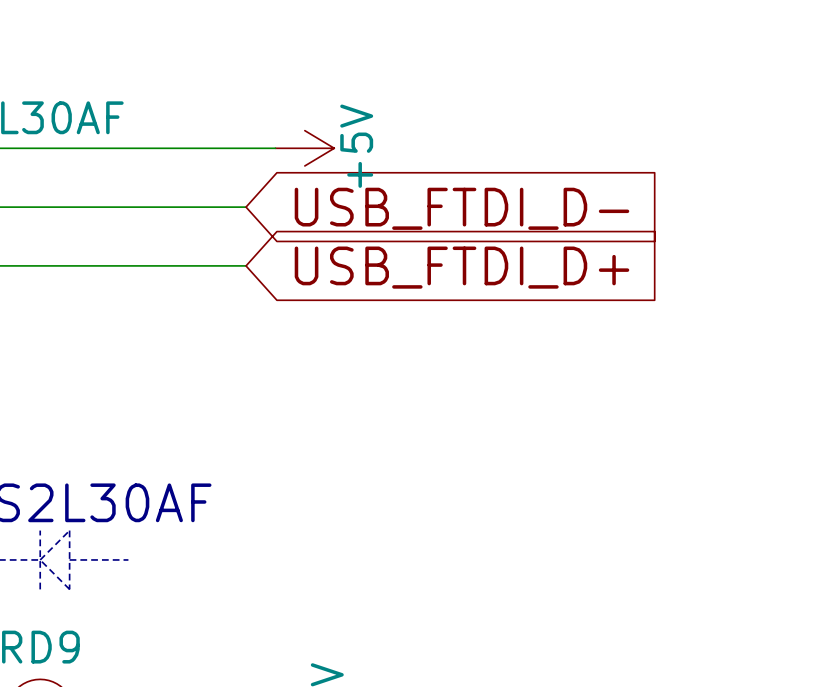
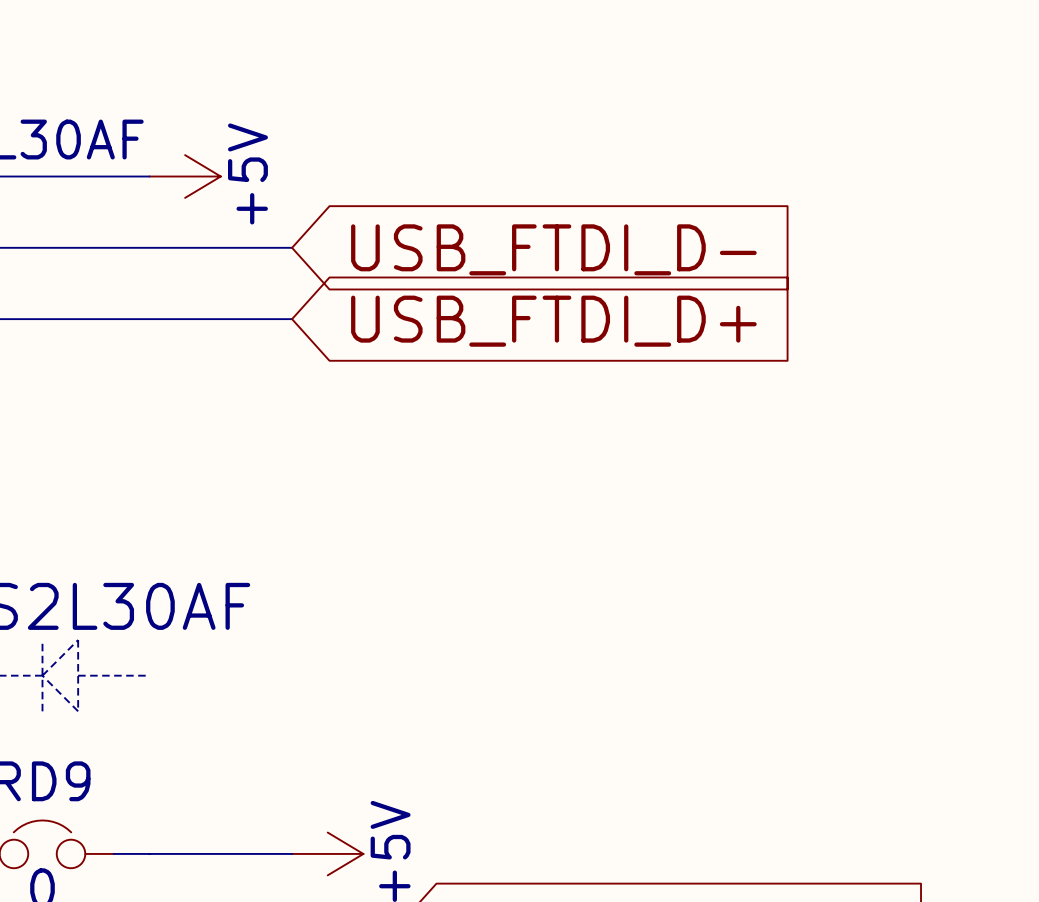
wire: (128, 148) (275, 148) -> none
power symbol position: +5V (304, 148) -> +5V (185, 176)

